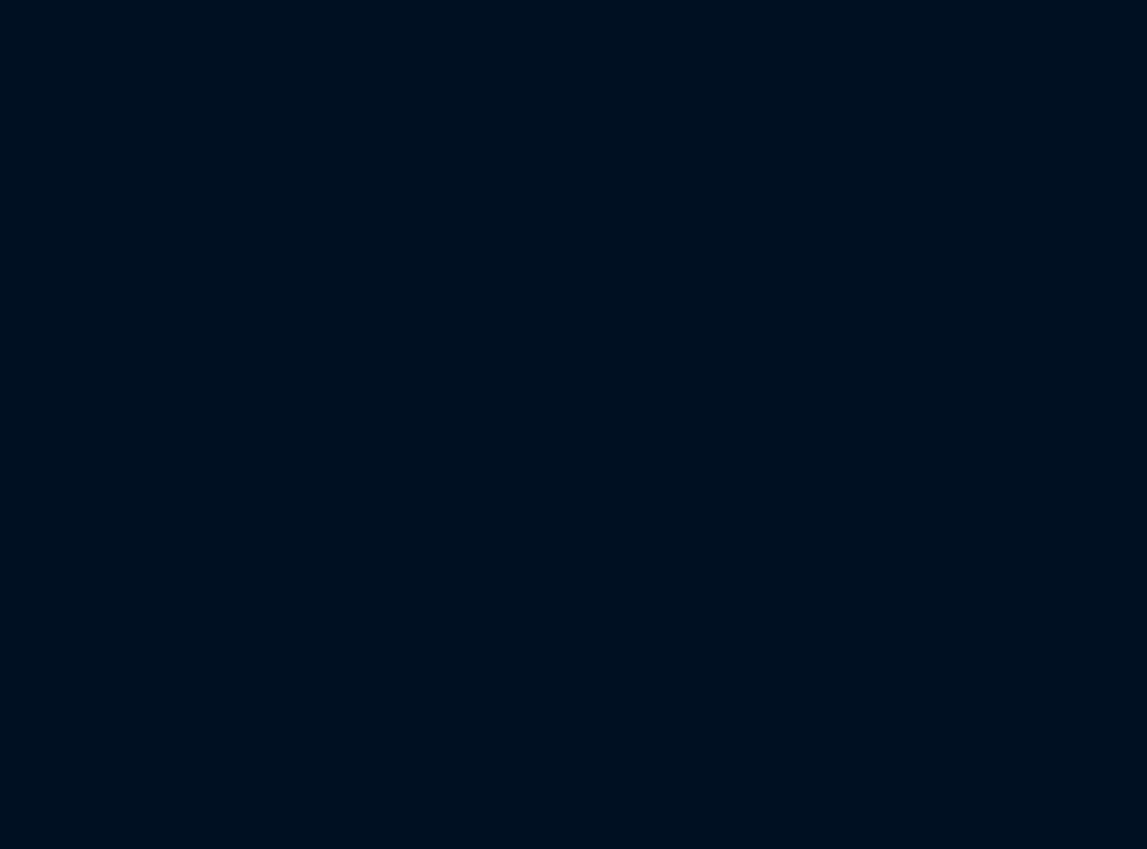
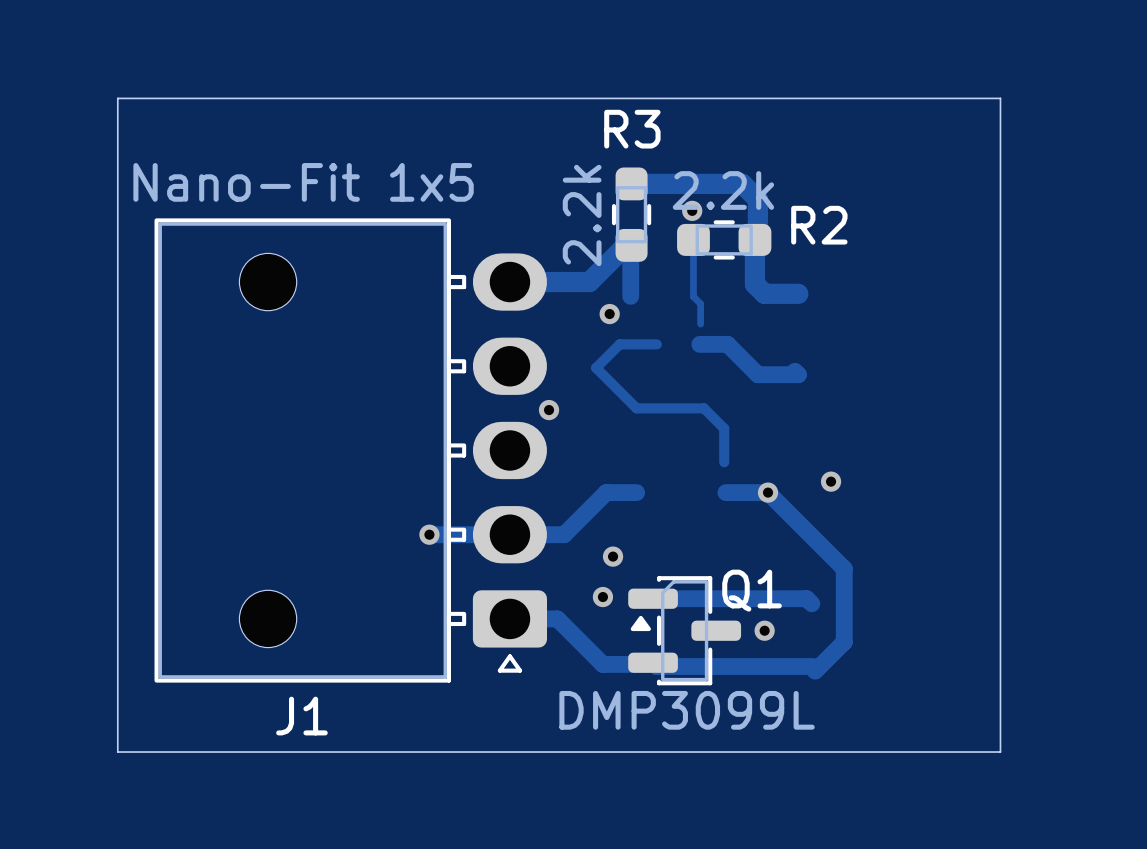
board edge: none -> (117, 98) (1000, 98) (1000, 752) (117, 752) (117, 98)
track: none -> (631, 183) (742, 183) (757, 199) (757, 239)
via: none -> (692, 210)
R3: none -> 2.2k (631, 214)
track: none -> (693, 239) (693, 296) (700, 303) (700, 324)
R2: none -> 2.2k (724, 239)
track: none -> (754, 239) (754, 284) (764, 293) (798, 293)
track: none -> (631, 245) (626, 245) (589, 282) (511, 282)
track: none -> (630, 246) (630, 296)
via: none -> (609, 314)
track: none -> (656, 344) (619, 344) (596, 367) (636, 408) (704, 408) (724, 428) (724, 462)
track: none -> (699, 344) (727, 344) (757, 374) (798, 374) (794, 371)
via: none -> (549, 410)
J1: none -> Nano-Fit 1x5 (350, 450)
via: none -> (831, 481)
track: none -> (636, 492) (606, 492) (564, 534) (429, 534)
track: none -> (725, 492) (768, 492) (844, 568) (844, 642) (815, 671)
via: none -> (768, 492)
via: none -> (429, 534)
via: none -> (613, 556)
via: none -> (602, 597)
track: none -> (653, 598) (806, 598) (811, 603)
track: none -> (509, 618) (557, 618) (602, 664) (656, 664)
Q1: none -> DMP3099L (684, 630)
via: none -> (764, 630)
track: none -> (653, 662) (656, 666) (813, 666)

